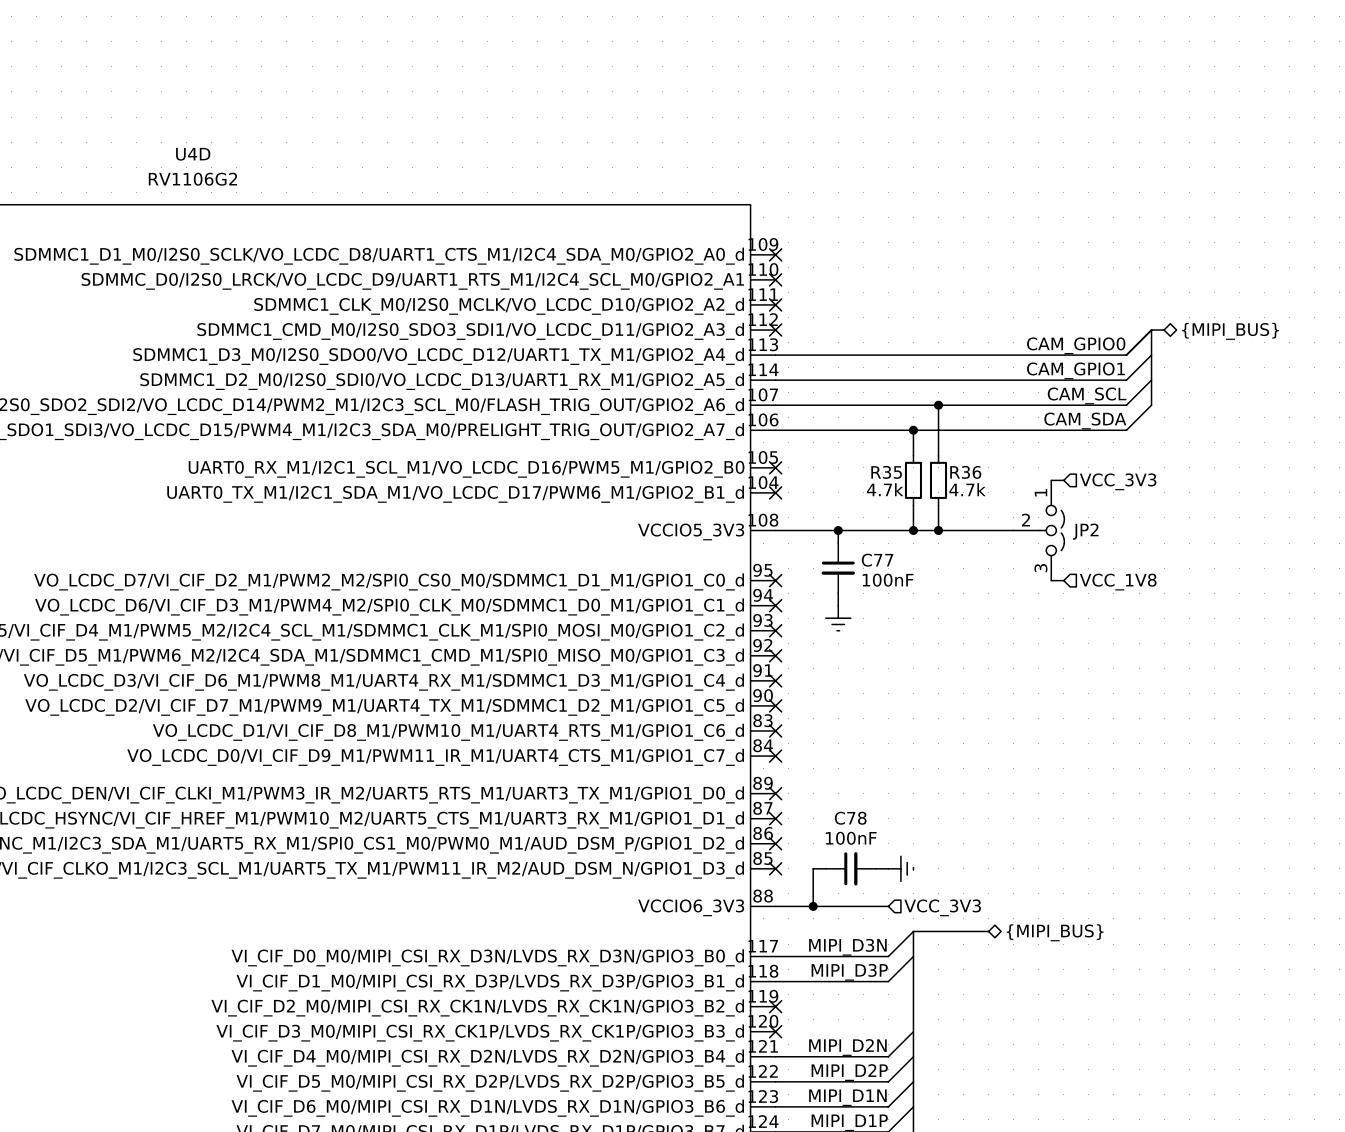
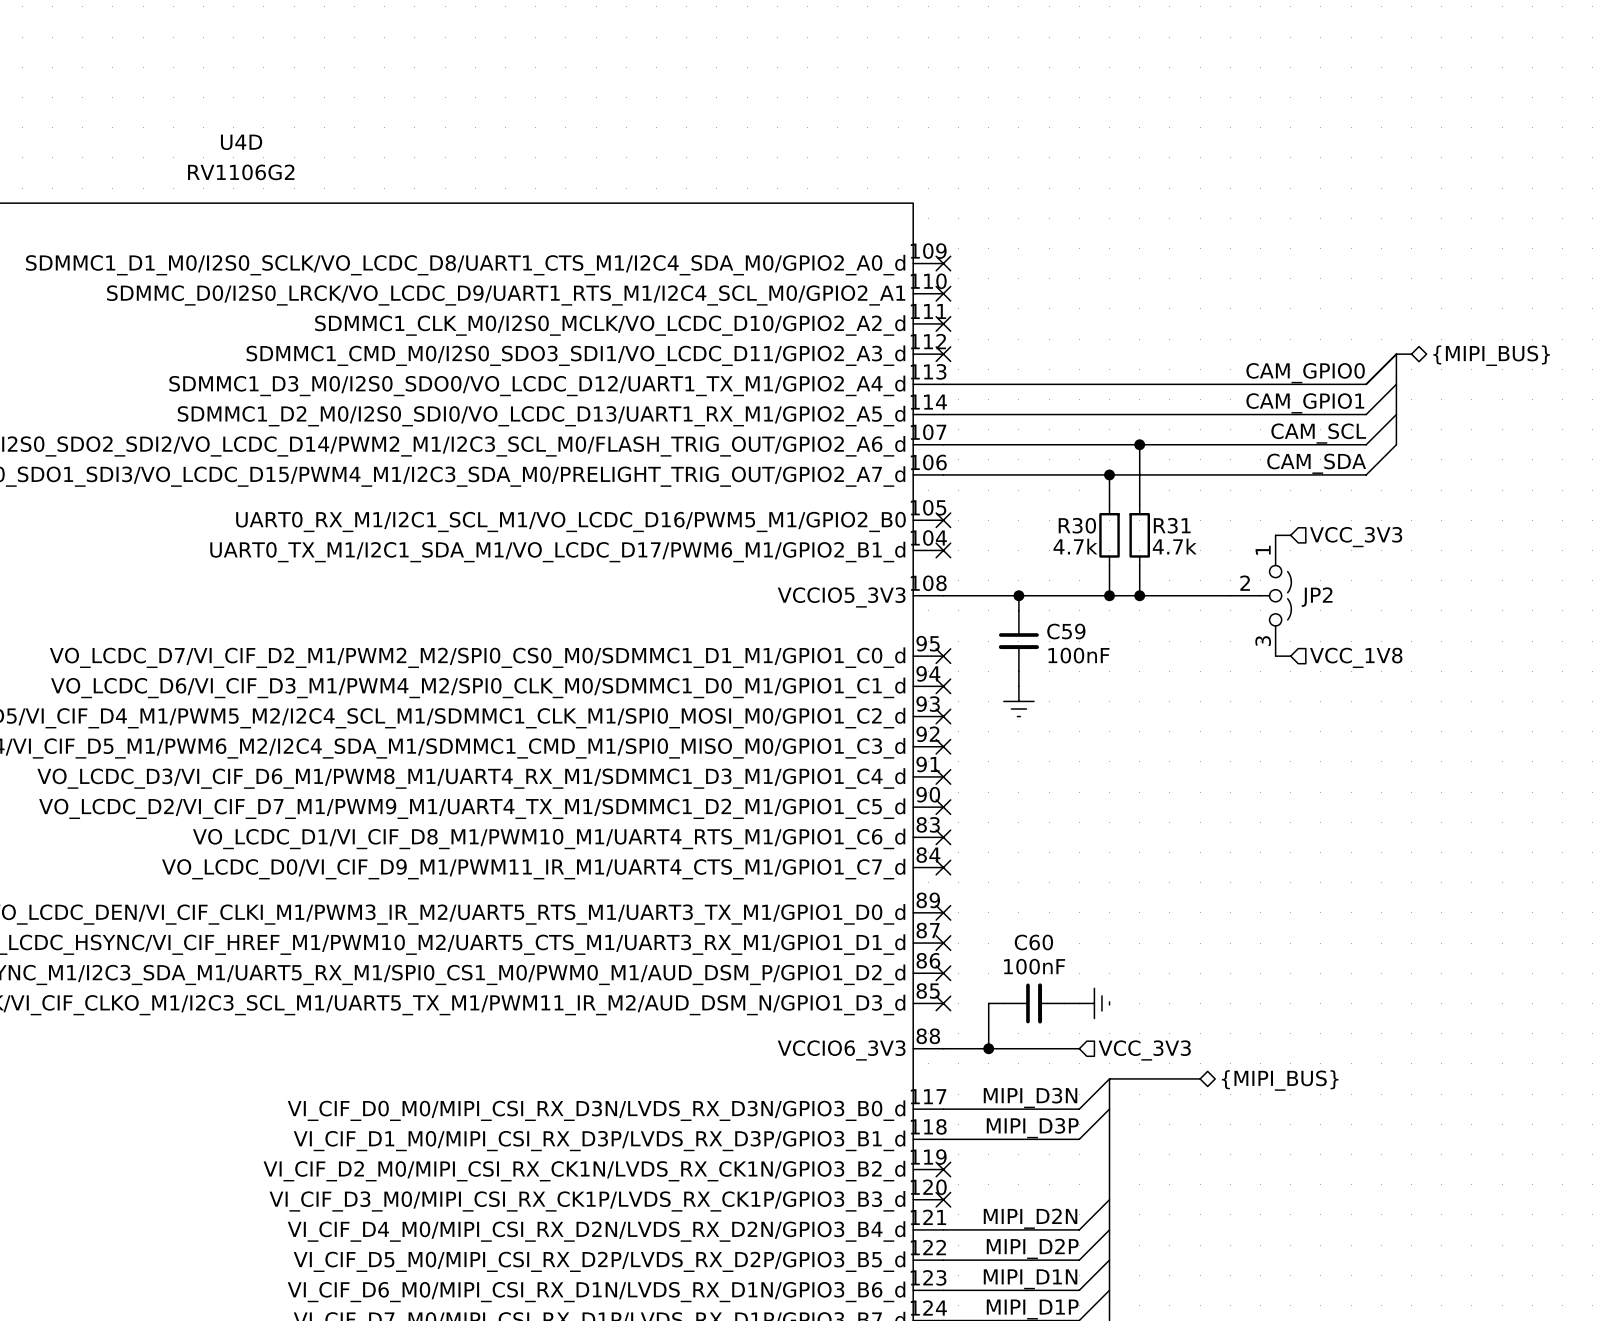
R35 name: R35 (886, 472) -> R30 (1077, 525)
R36 name: R36 (965, 472) -> R31 (1172, 525)
C77 name: C77 (877, 560) -> C59 (1066, 631)
C78 name: C78 (850, 818) -> C60 (1033, 942)

